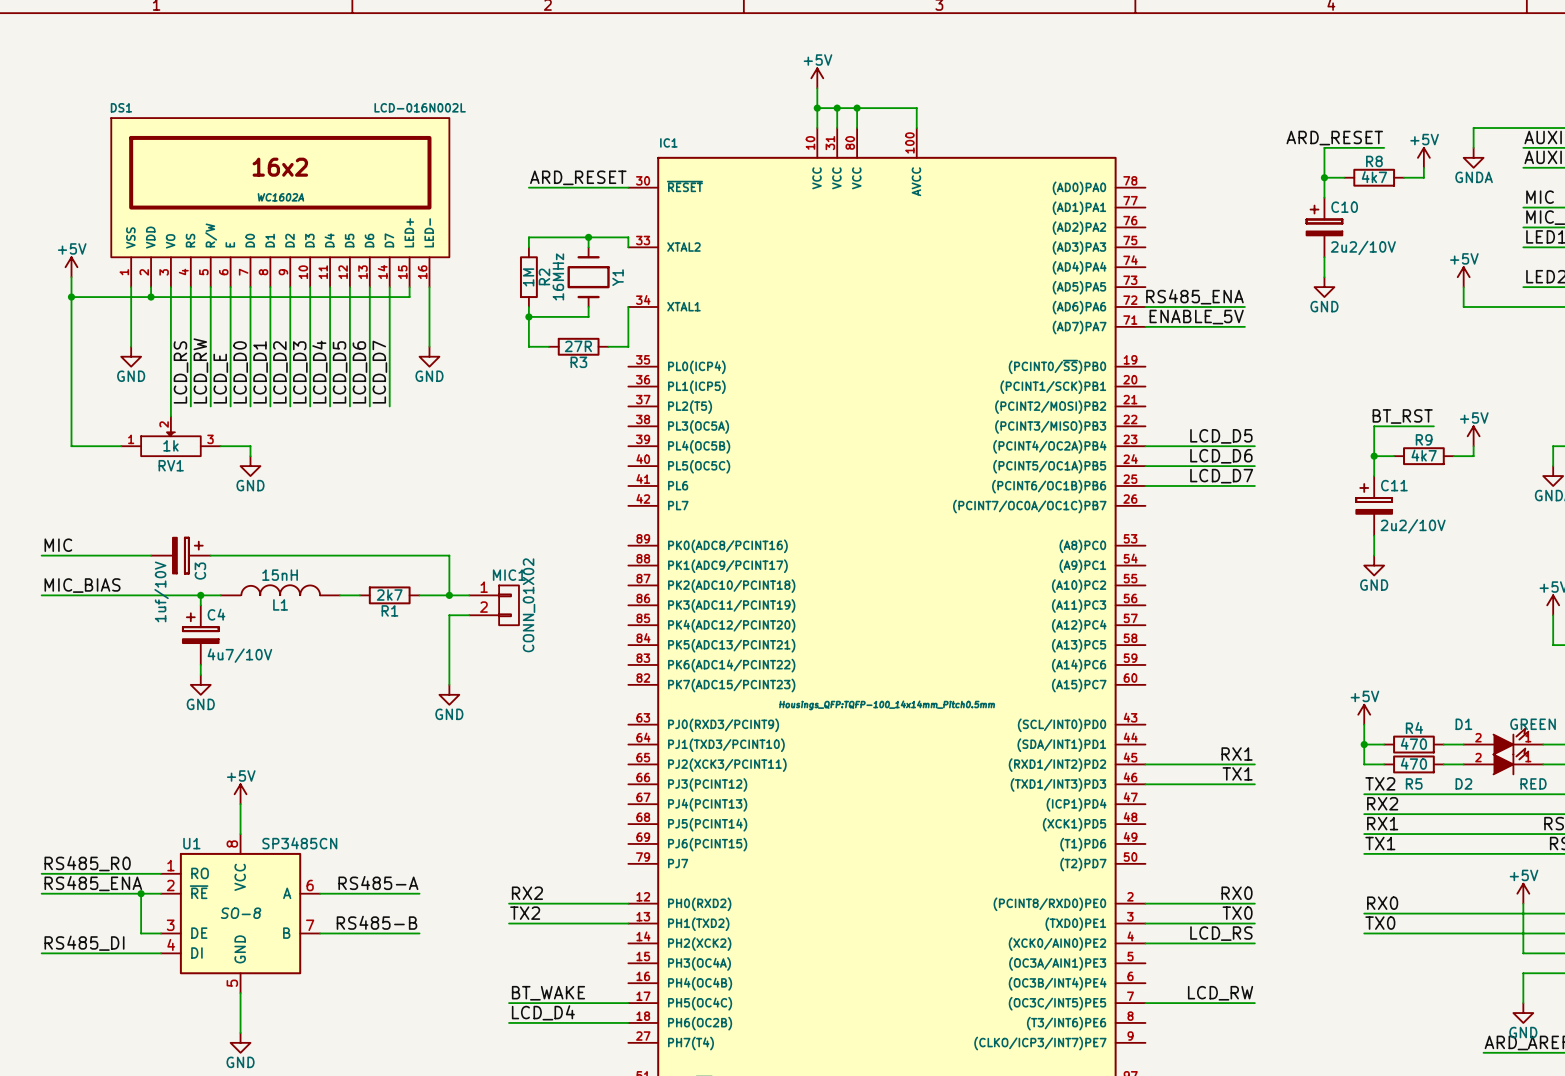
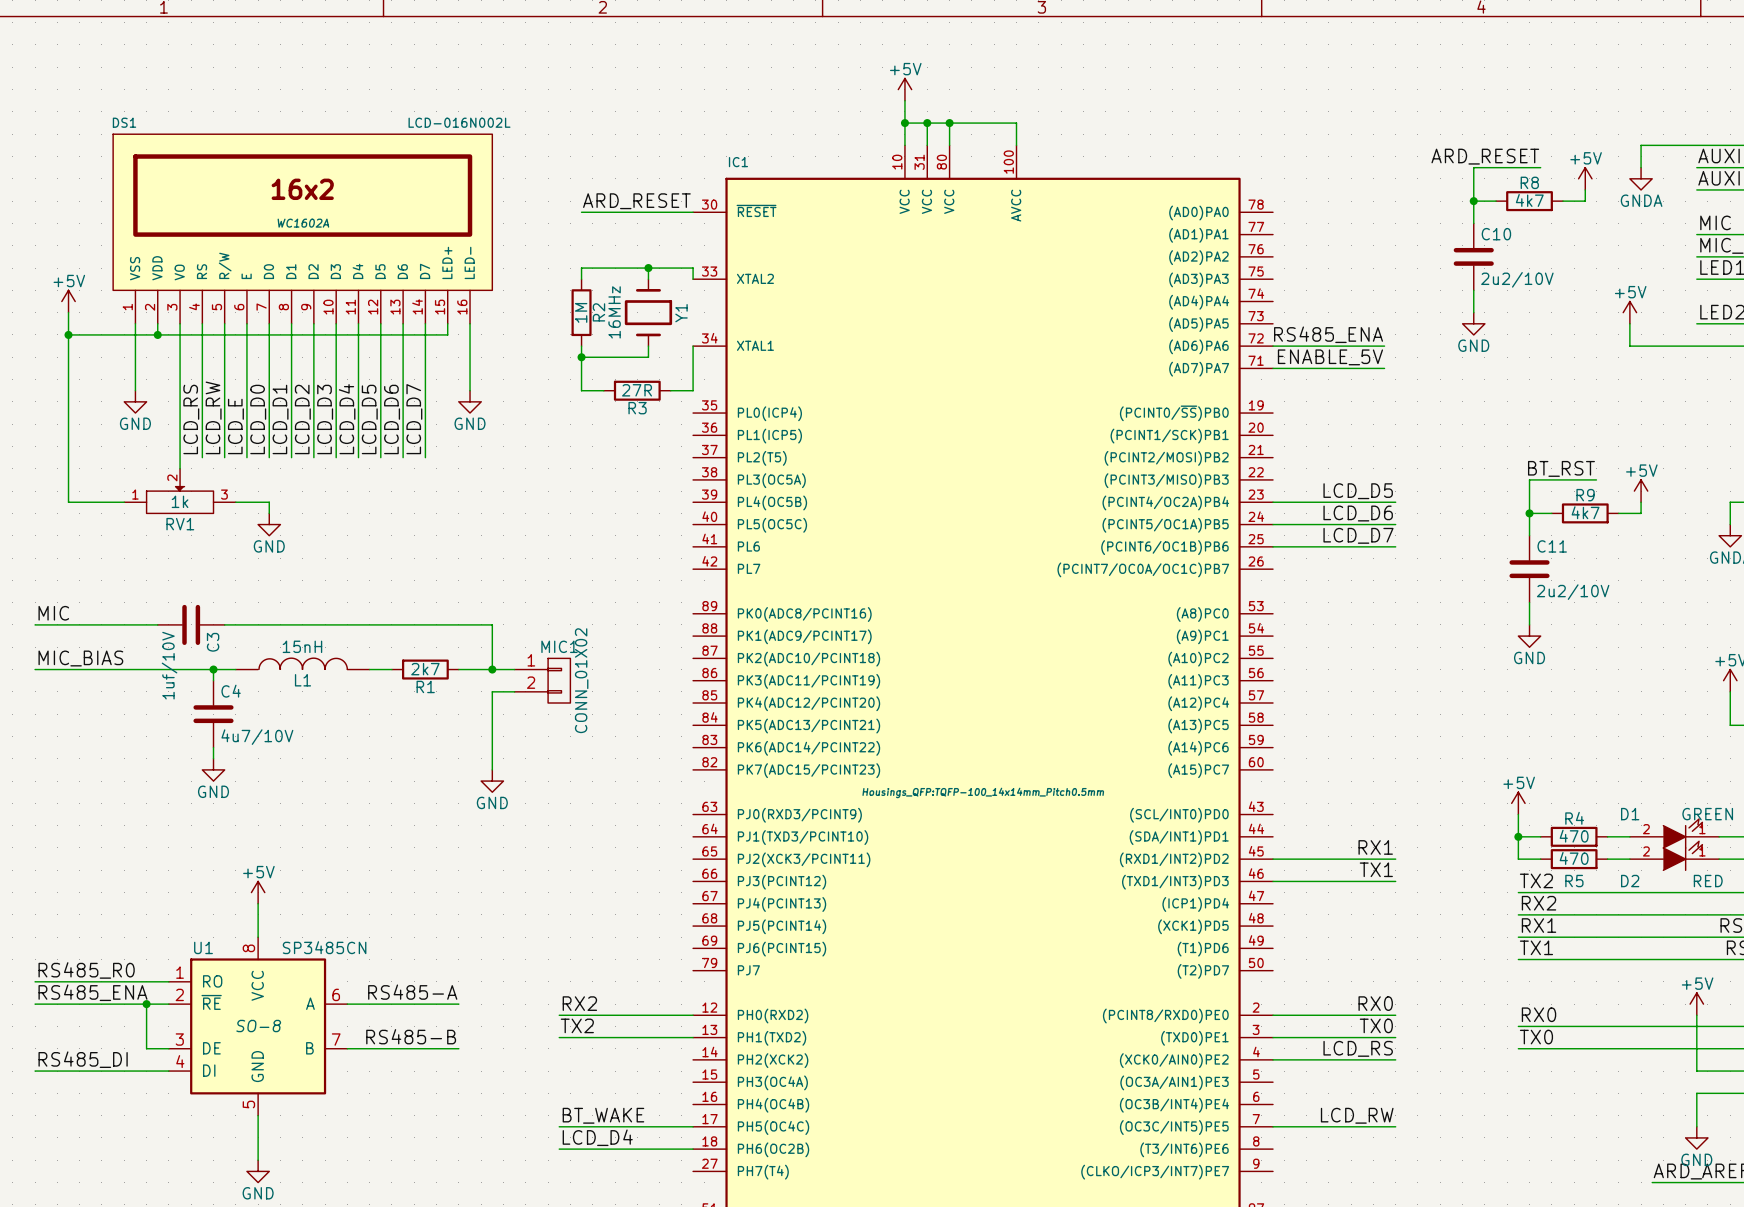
C10 symbol: [1306, 197, 1343, 258] -> [1453, 223, 1494, 291]
C11 symbol: [1356, 476, 1393, 536] -> [1509, 535, 1550, 603]
C3 symbol: [151, 537, 211, 574] -> [157, 604, 225, 646]
C4 symbol: [182, 605, 219, 665] -> [193, 680, 234, 748]

